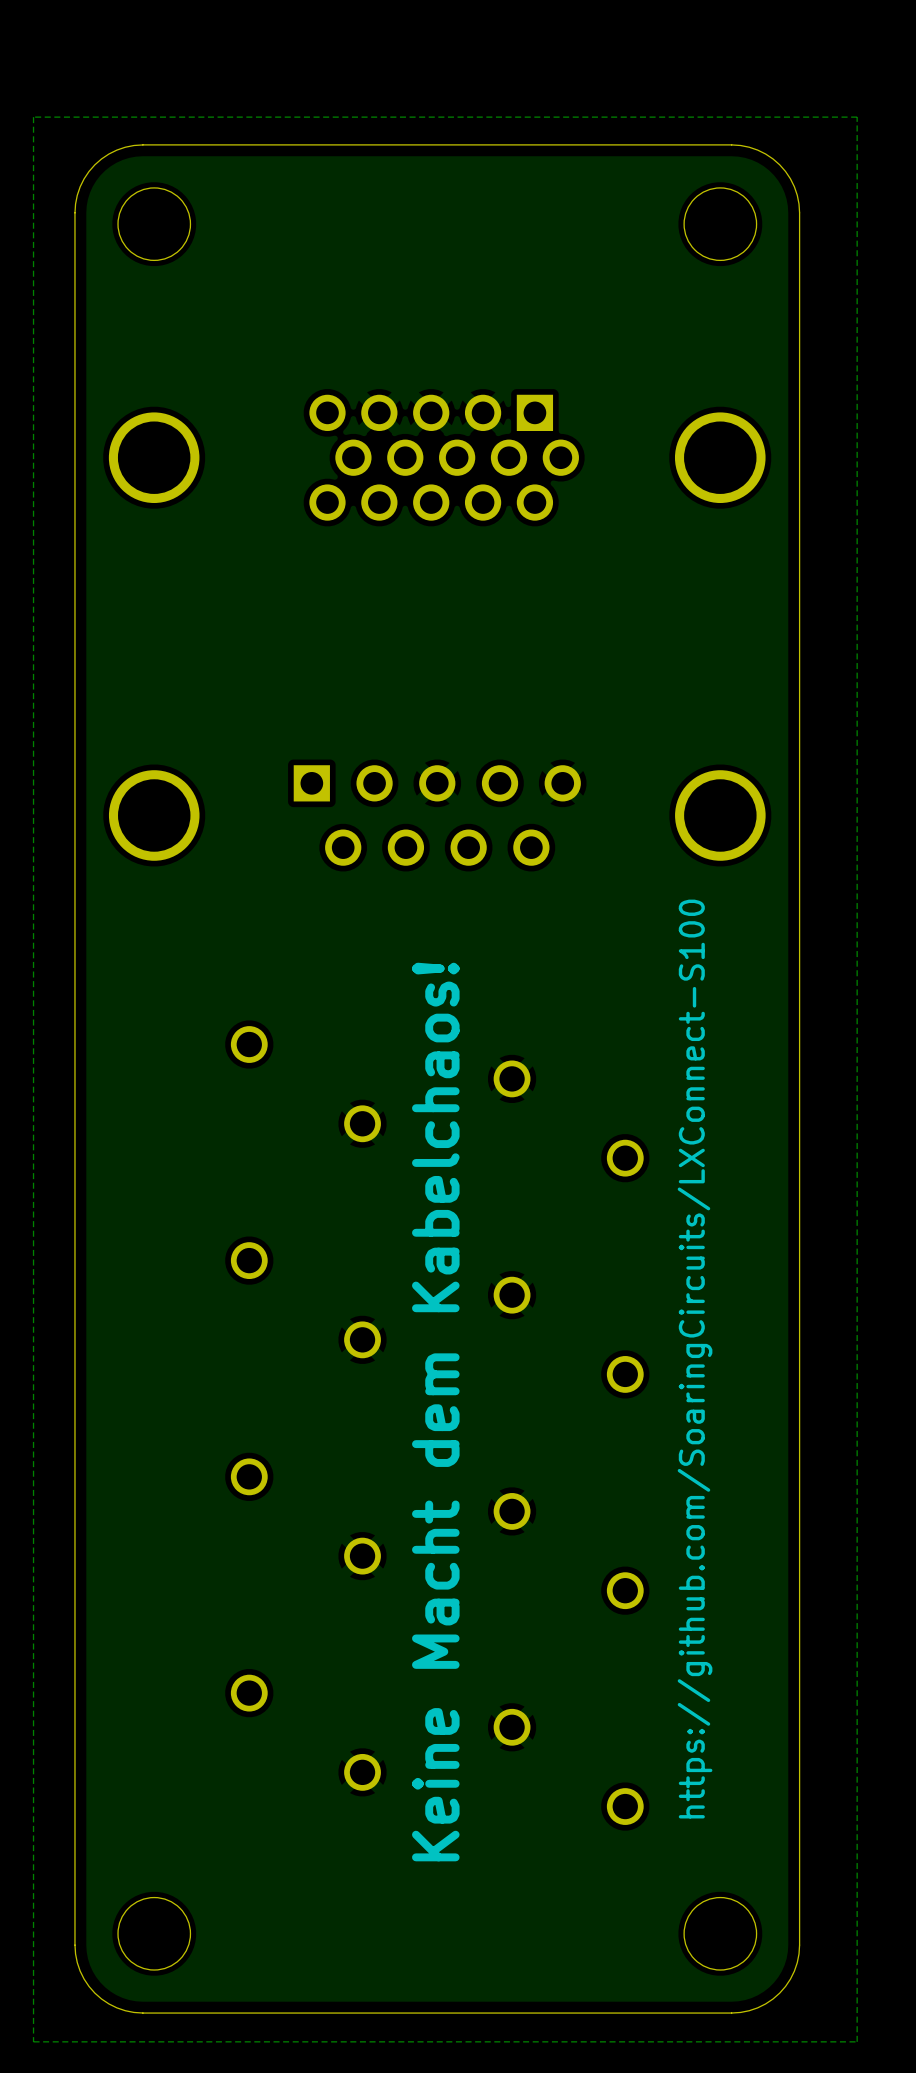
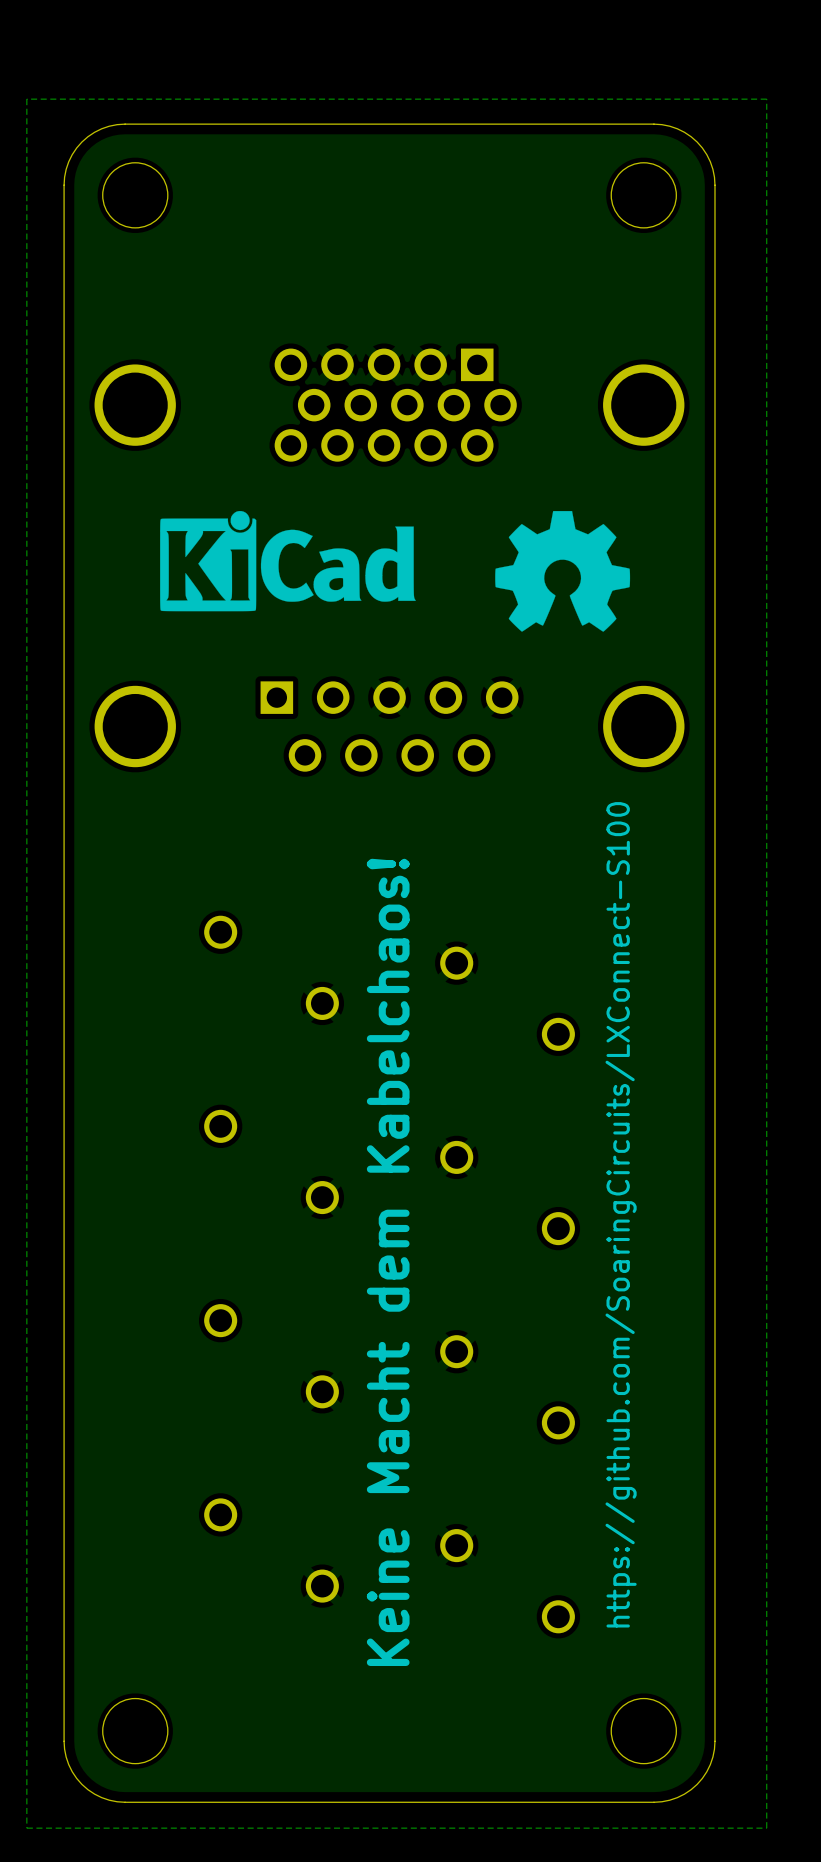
drawing: none -> [160, 510, 416, 612]
drawing: none -> [495, 511, 631, 632]

